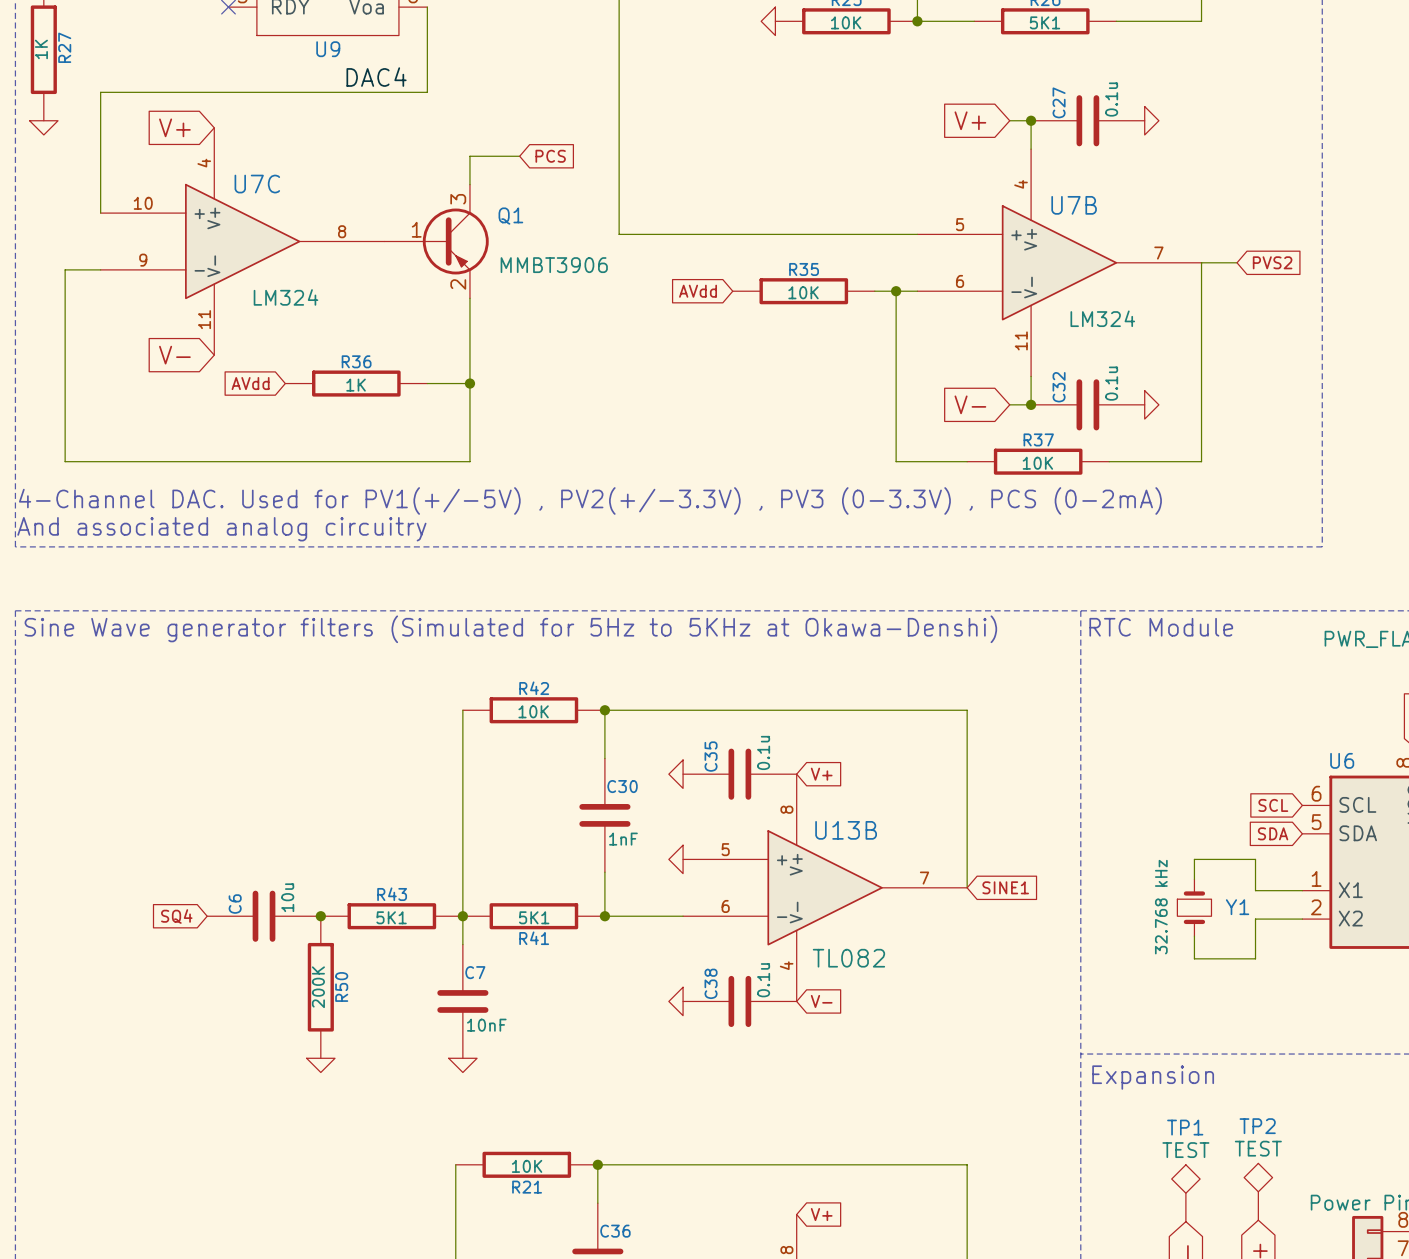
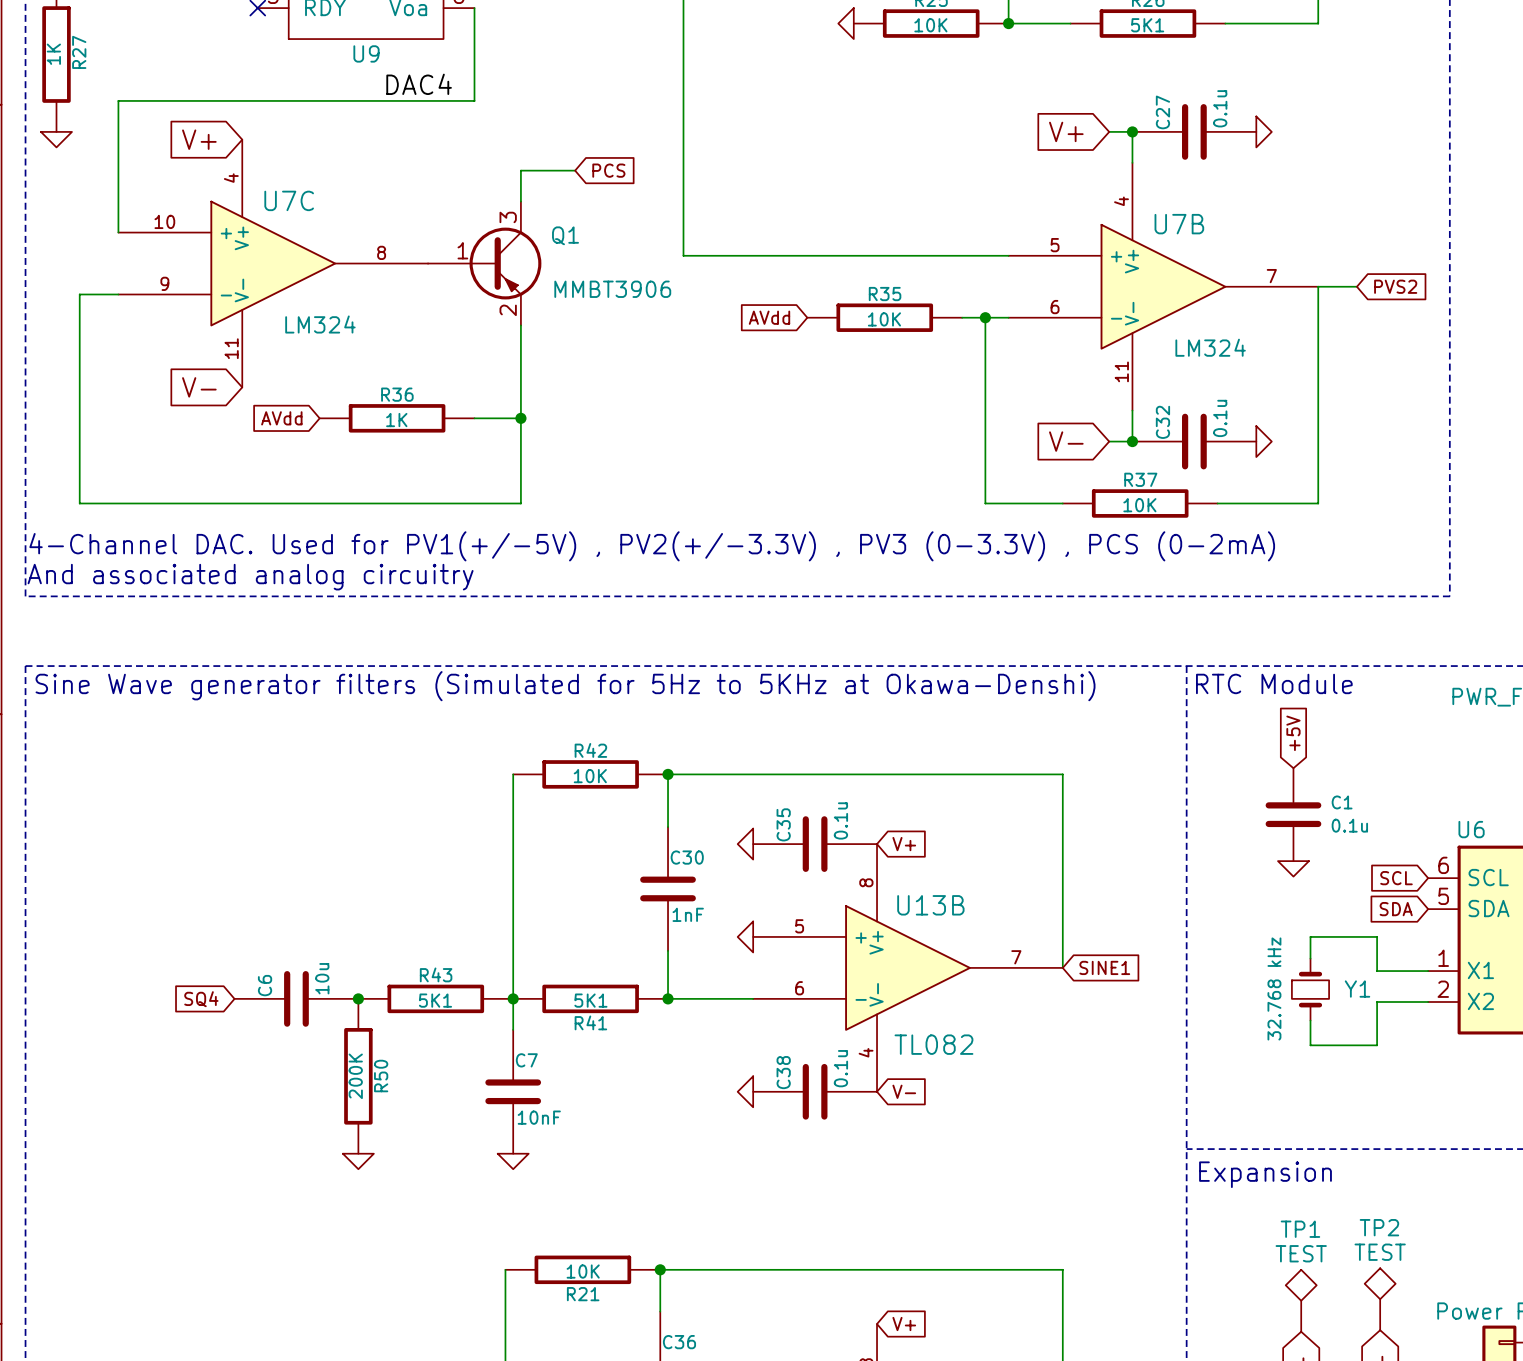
global label: none -> +5V (1293, 733)
C1: none -> 0.1u (1293, 814)
power symbol: none -> (1293, 868)

